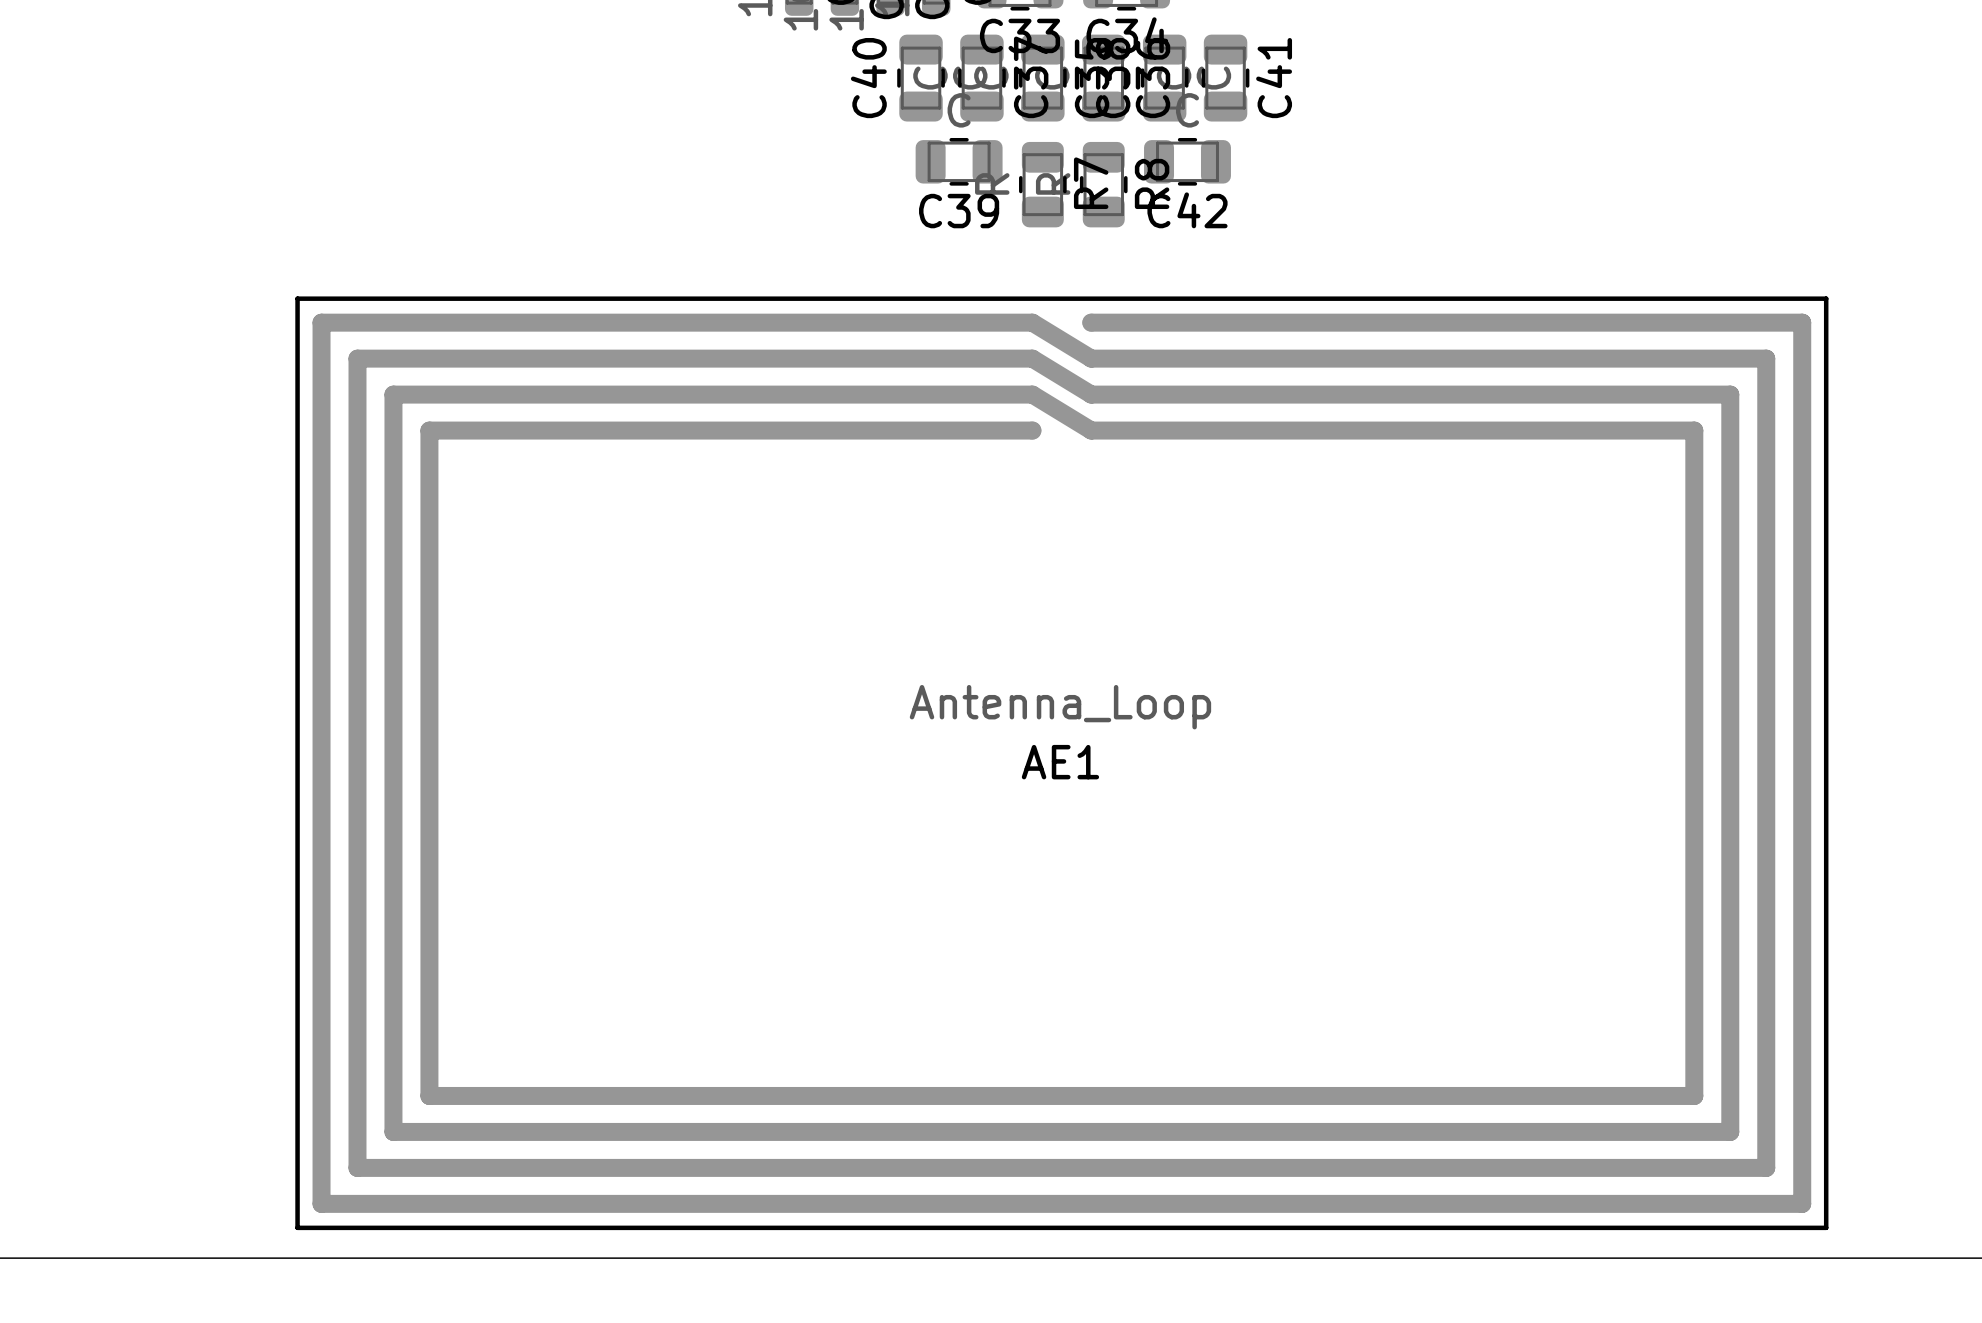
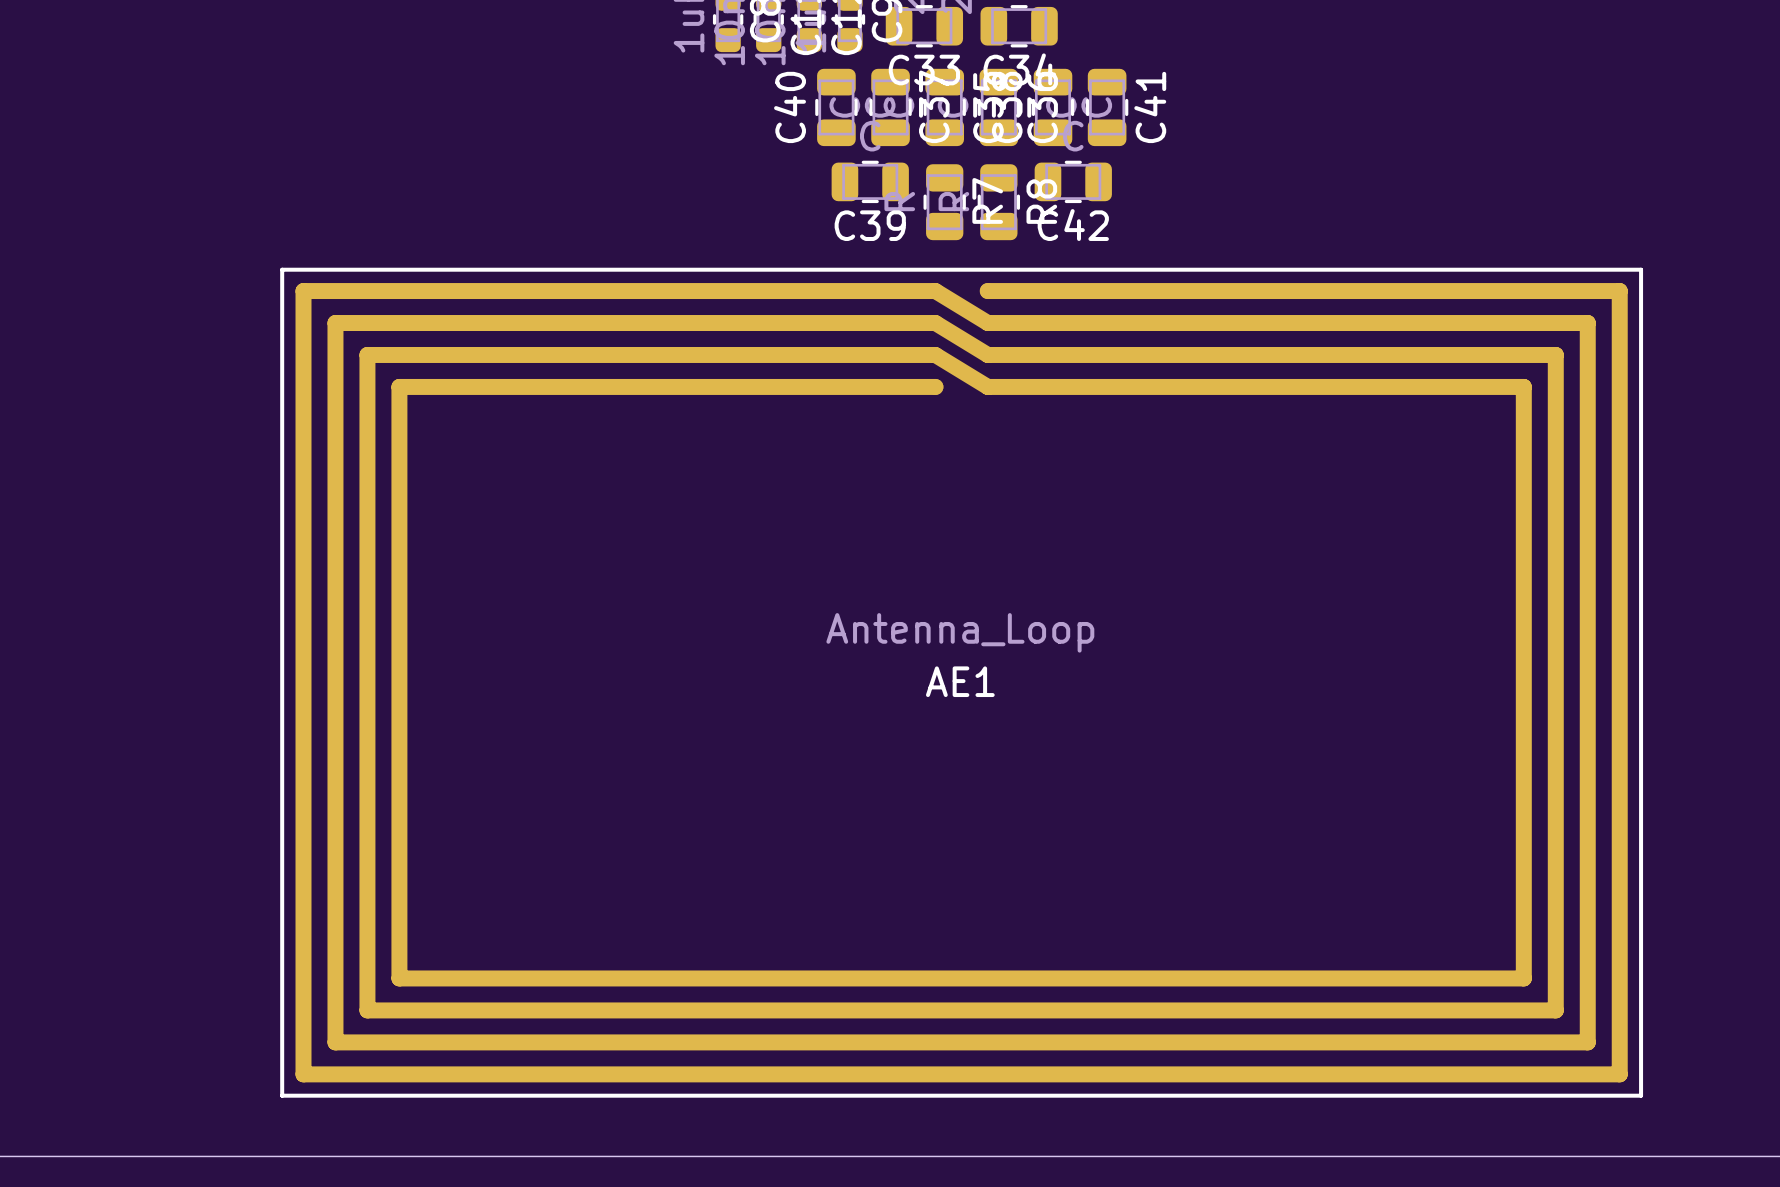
AE1 position: (1061, 763) -> (961, 682)

